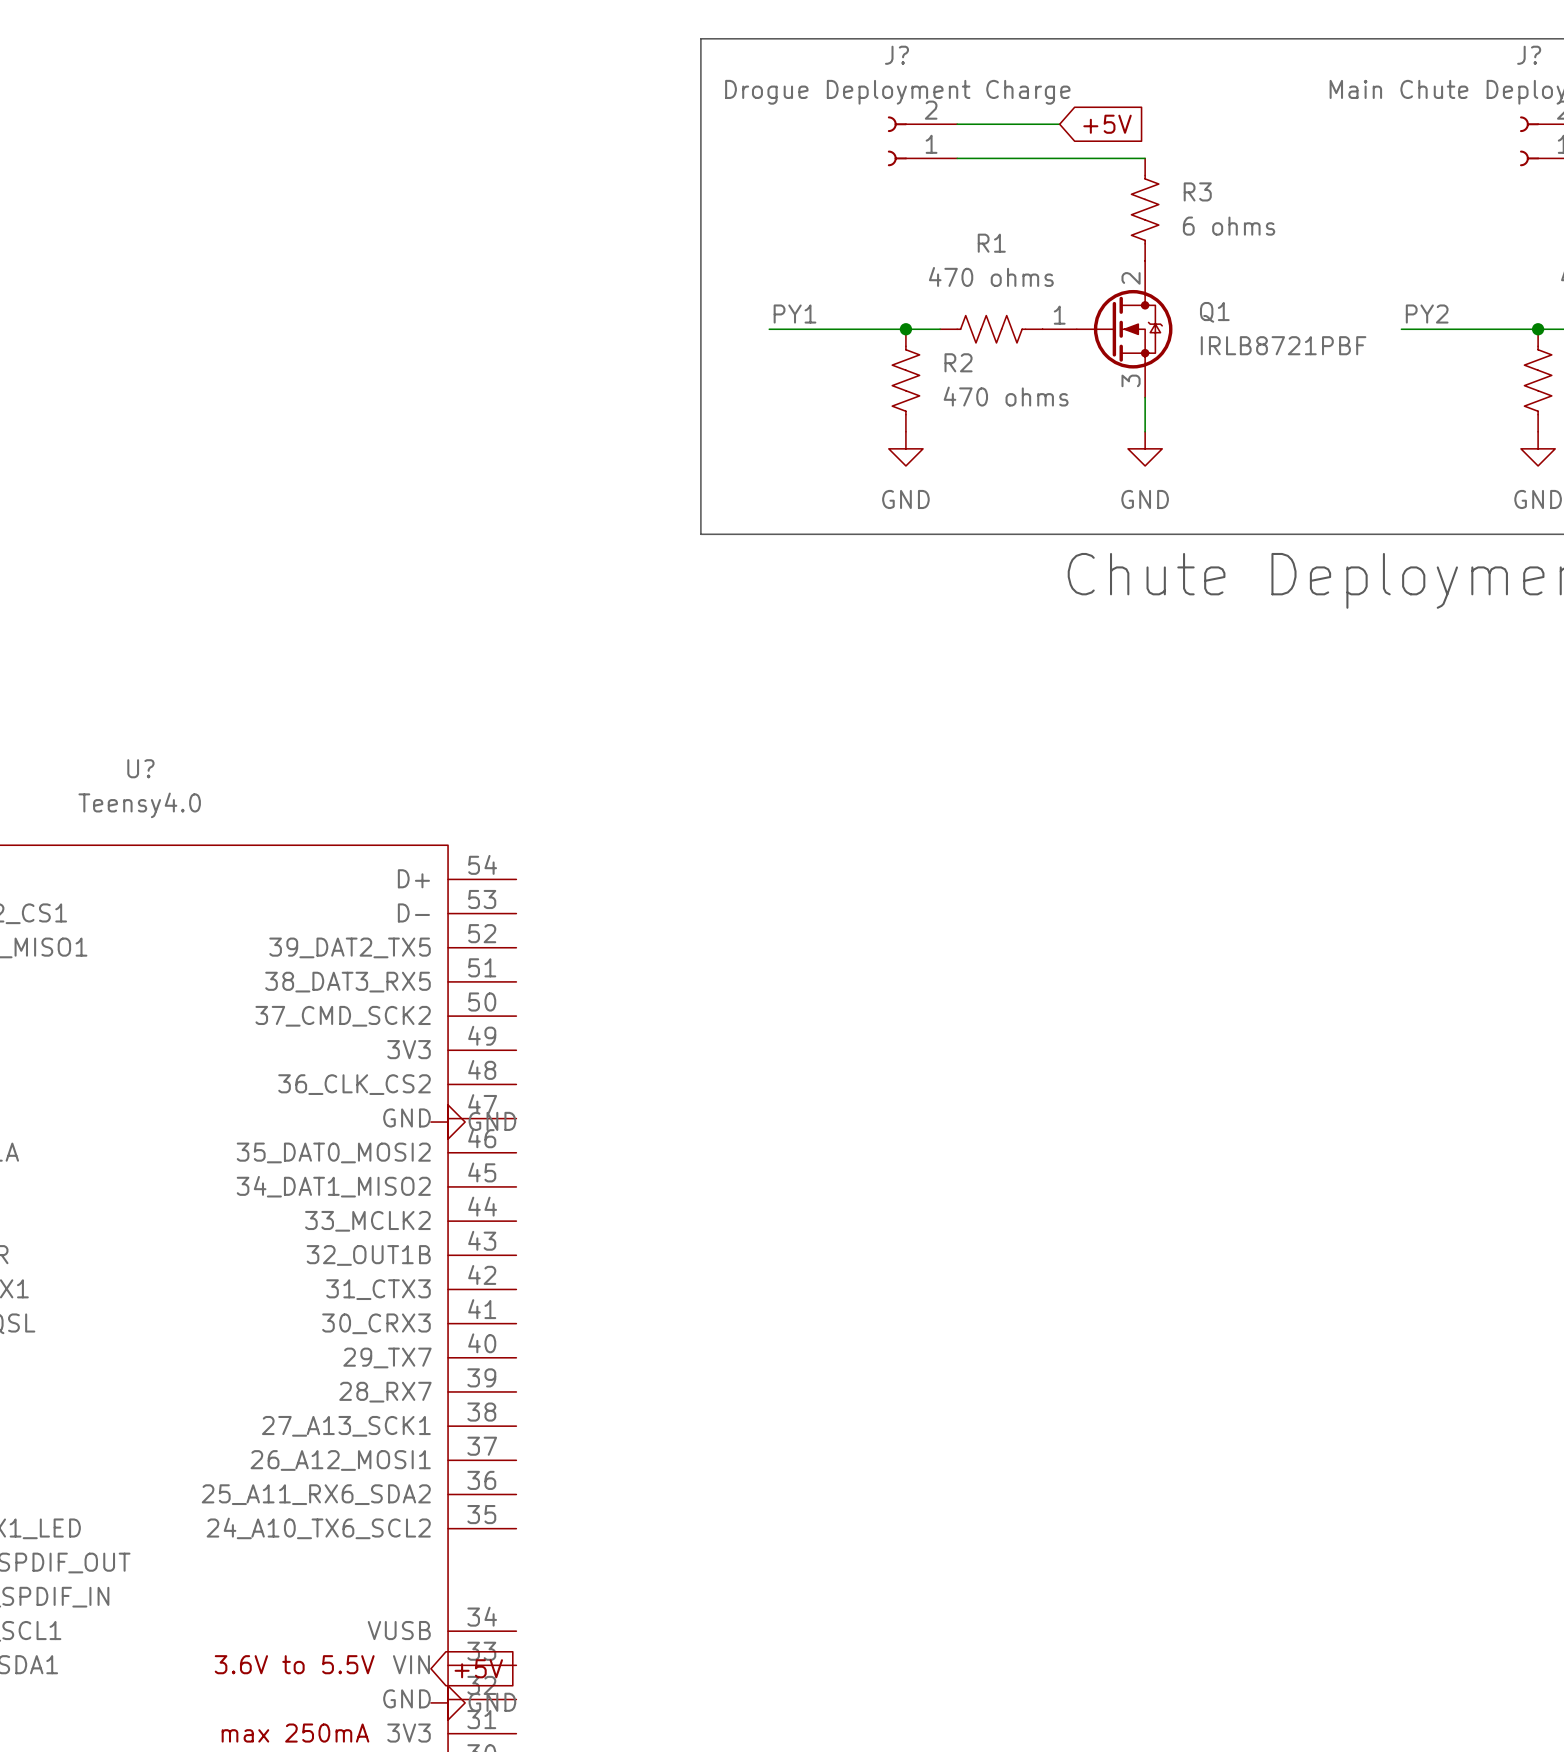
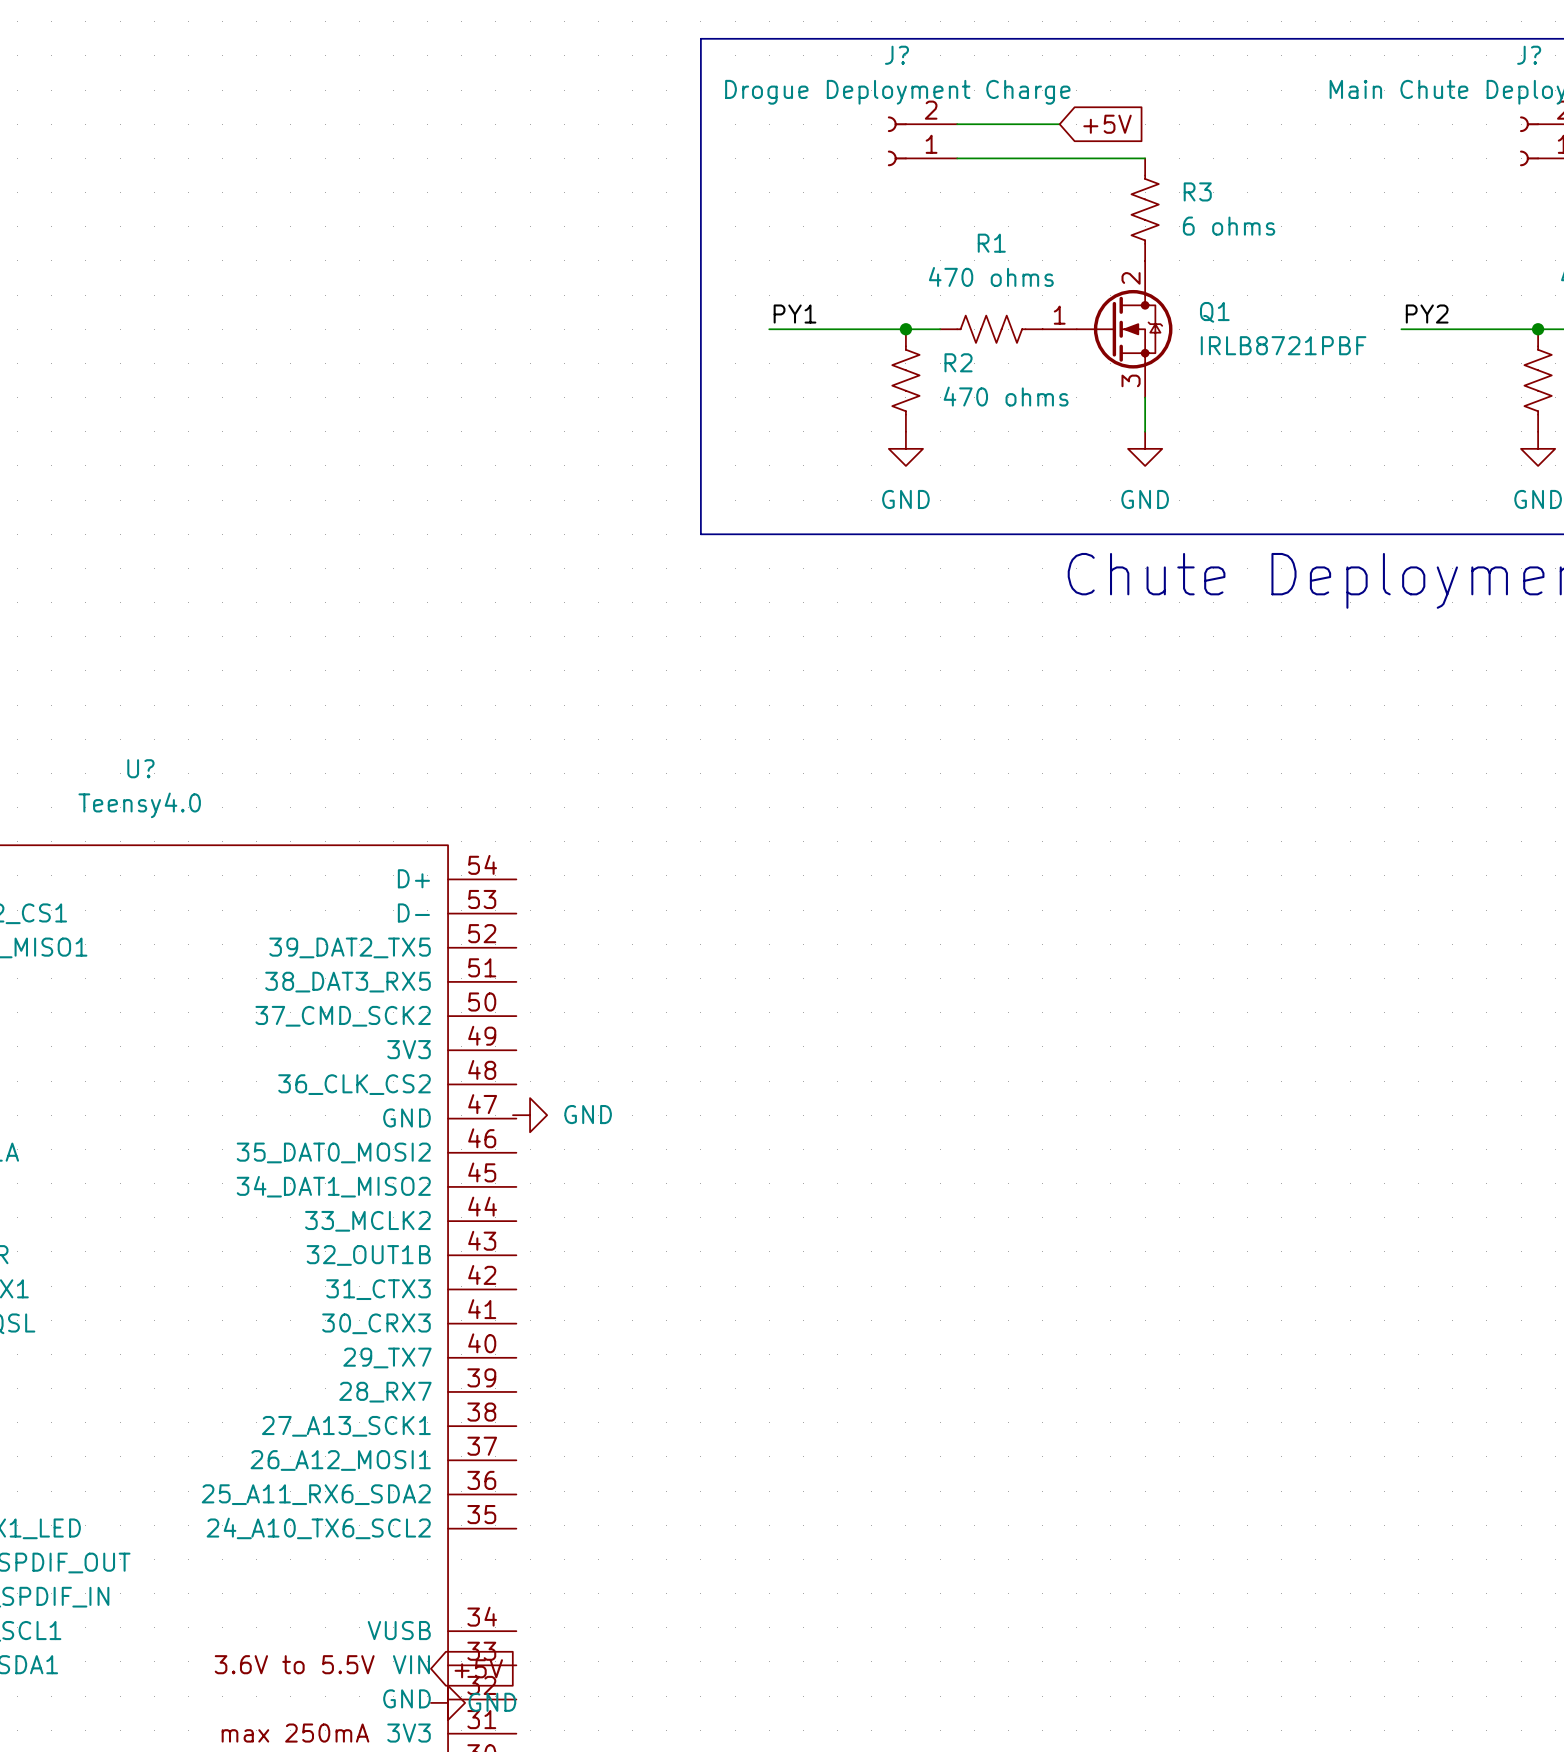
power symbol text position: GND (492, 1121) -> GND (588, 1114)
power symbol position: GND (448, 1122) -> GND (530, 1115)

